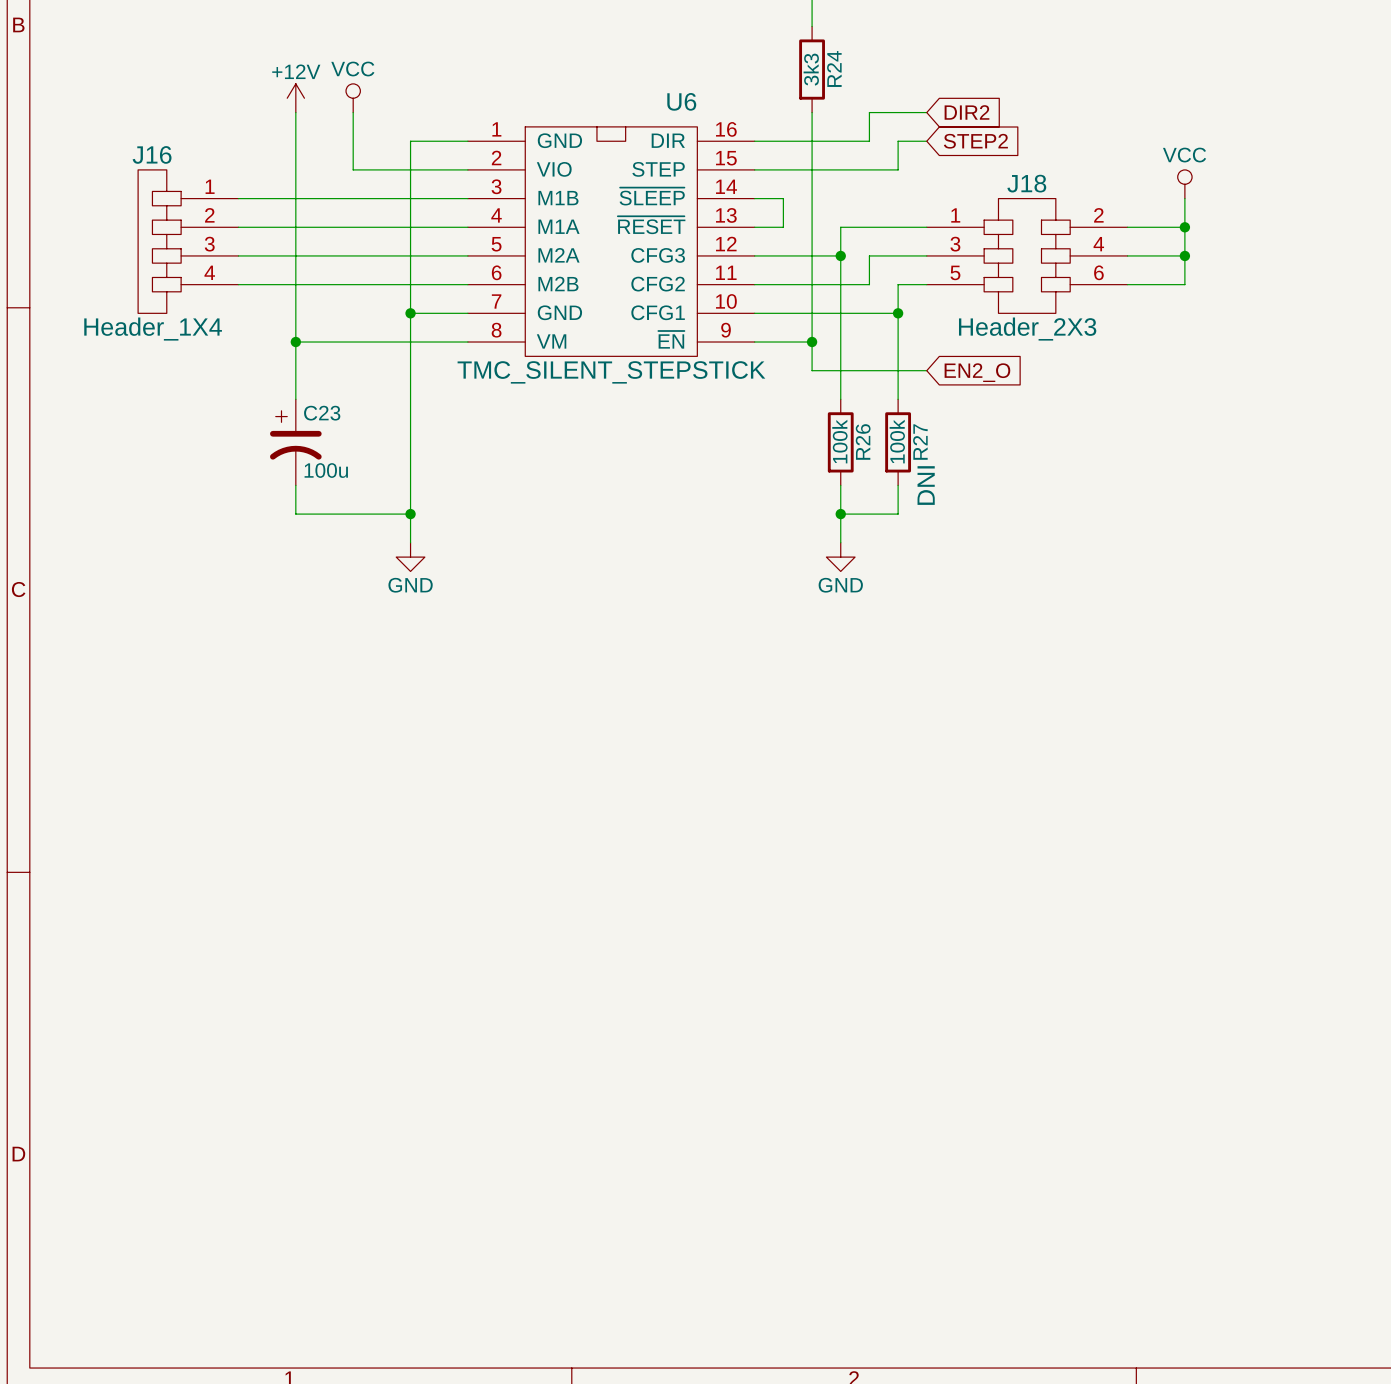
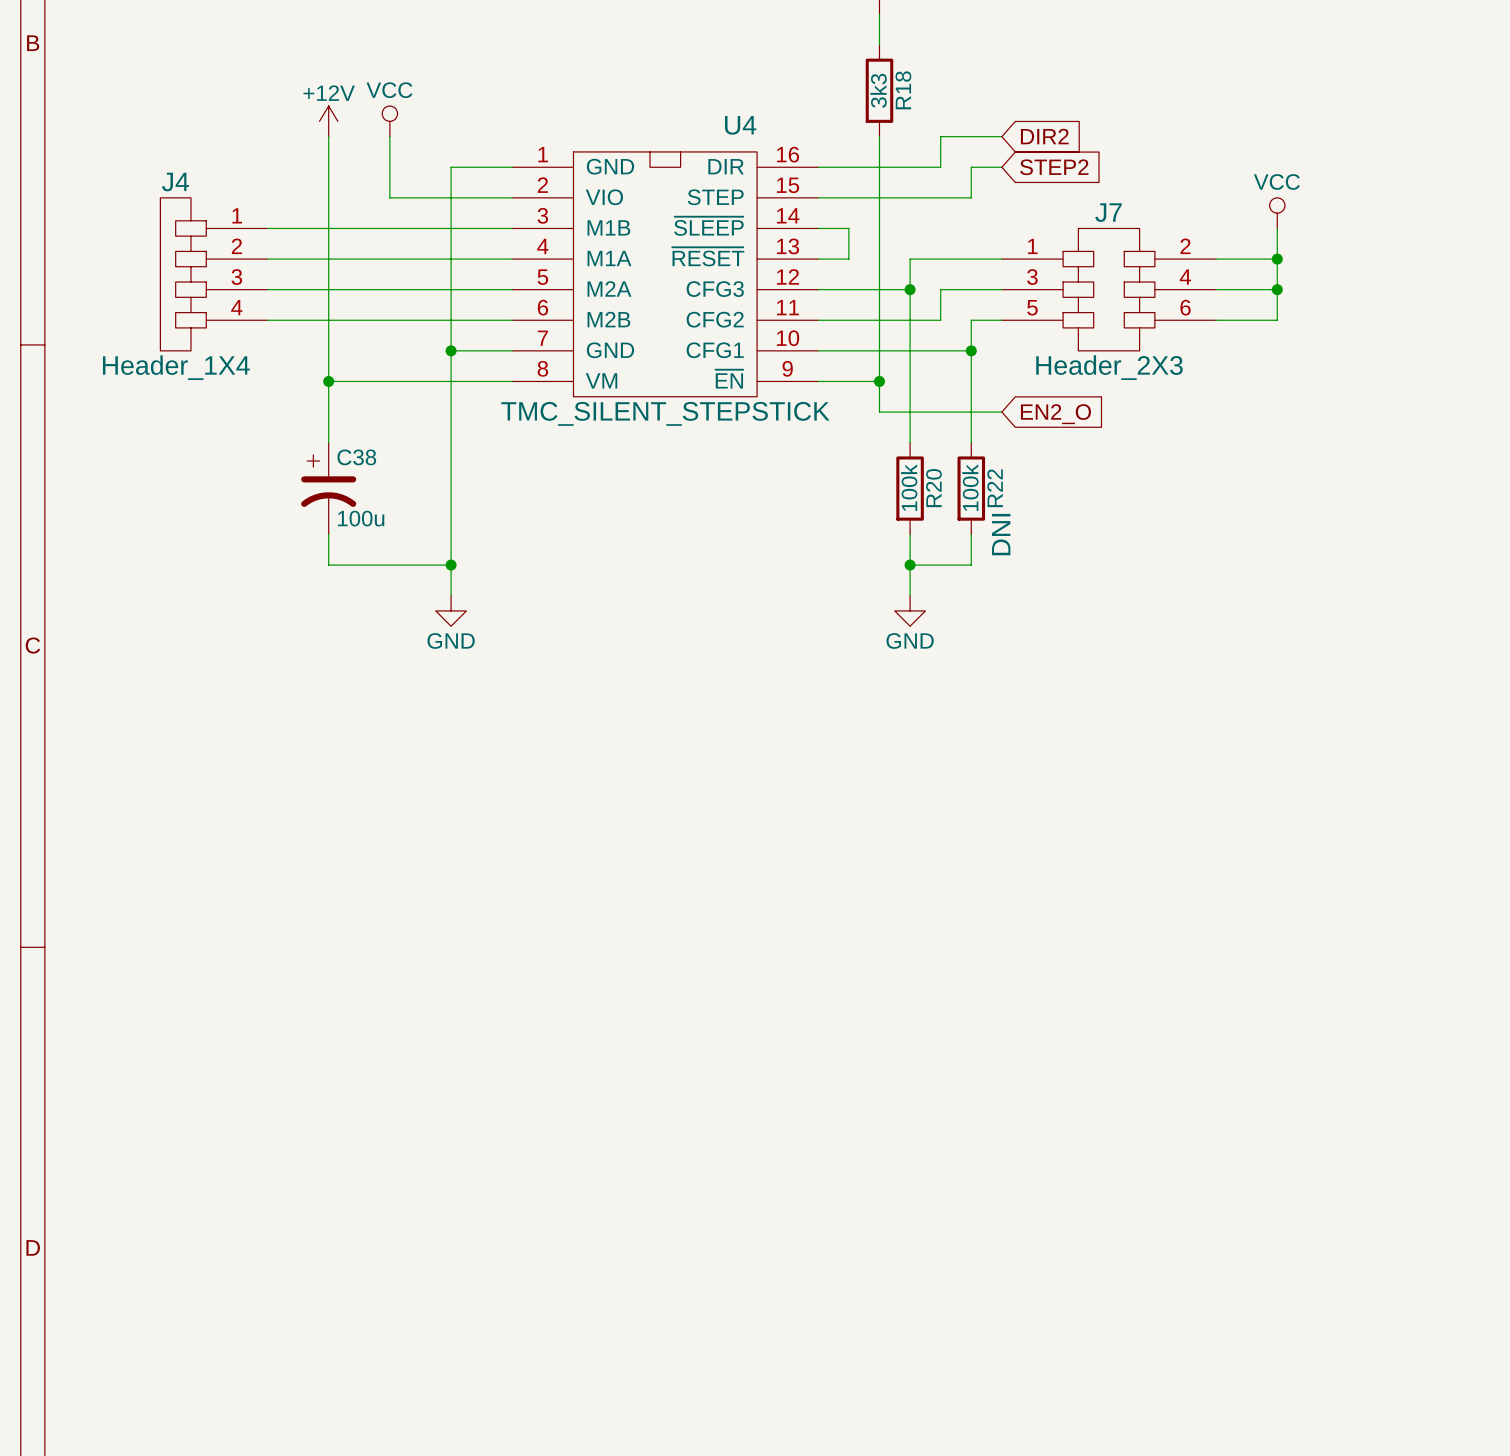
R24 name: R24 (834, 69) -> R18 (903, 90)
U6 name: U6 (681, 101) -> U4 (740, 125)
J16 name: J16 (152, 154) -> J4 (175, 182)
J18 name: J18 (1026, 183) -> J7 (1108, 212)
C23 name: C23 (322, 413) -> C38 (356, 457)
R26 name: R26 (863, 441) -> R20 (933, 488)
R27 name: R27 (920, 442) -> R22 (995, 488)

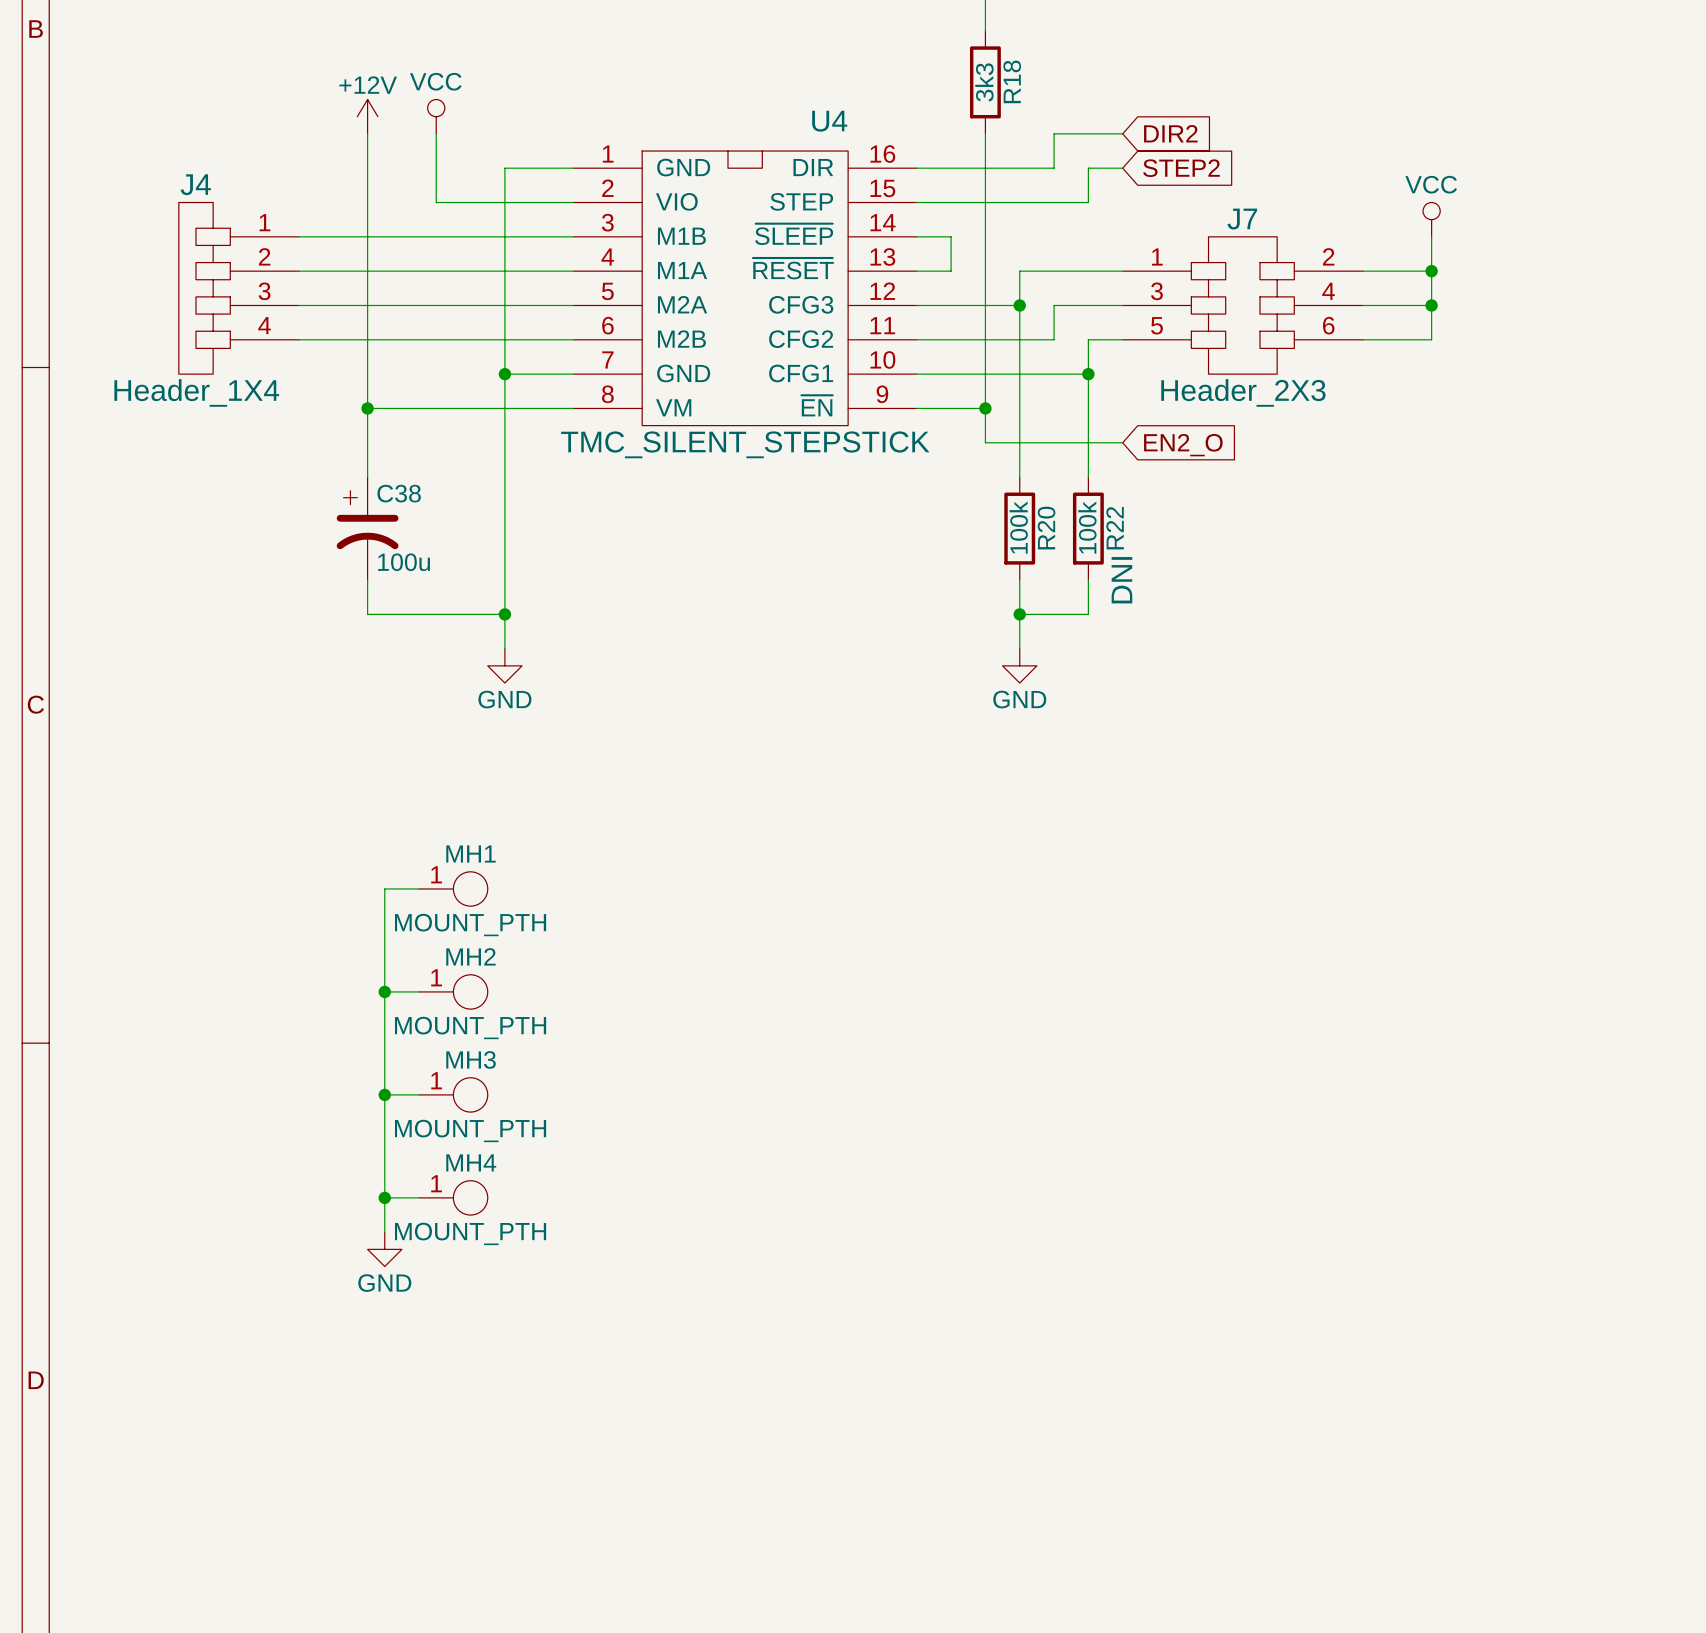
wire: none -> (419, 888) (384, 888) (384, 1232)
MH1: none -> MOUNT_PTH (453, 888)
wire: none -> (384, 991) (419, 991)
junction: none -> (384, 991)
MH2: none -> MOUNT_PTH (453, 991)
wire: none -> (384, 1094) (419, 1094)
junction: none -> (384, 1094)
MH3: none -> MOUNT_PTH (453, 1094)
wire: none -> (384, 1197) (419, 1197)
junction: none -> (384, 1197)
MH4: none -> MOUNT_PTH (453, 1197)
power symbol: none -> GND (384, 1249)

